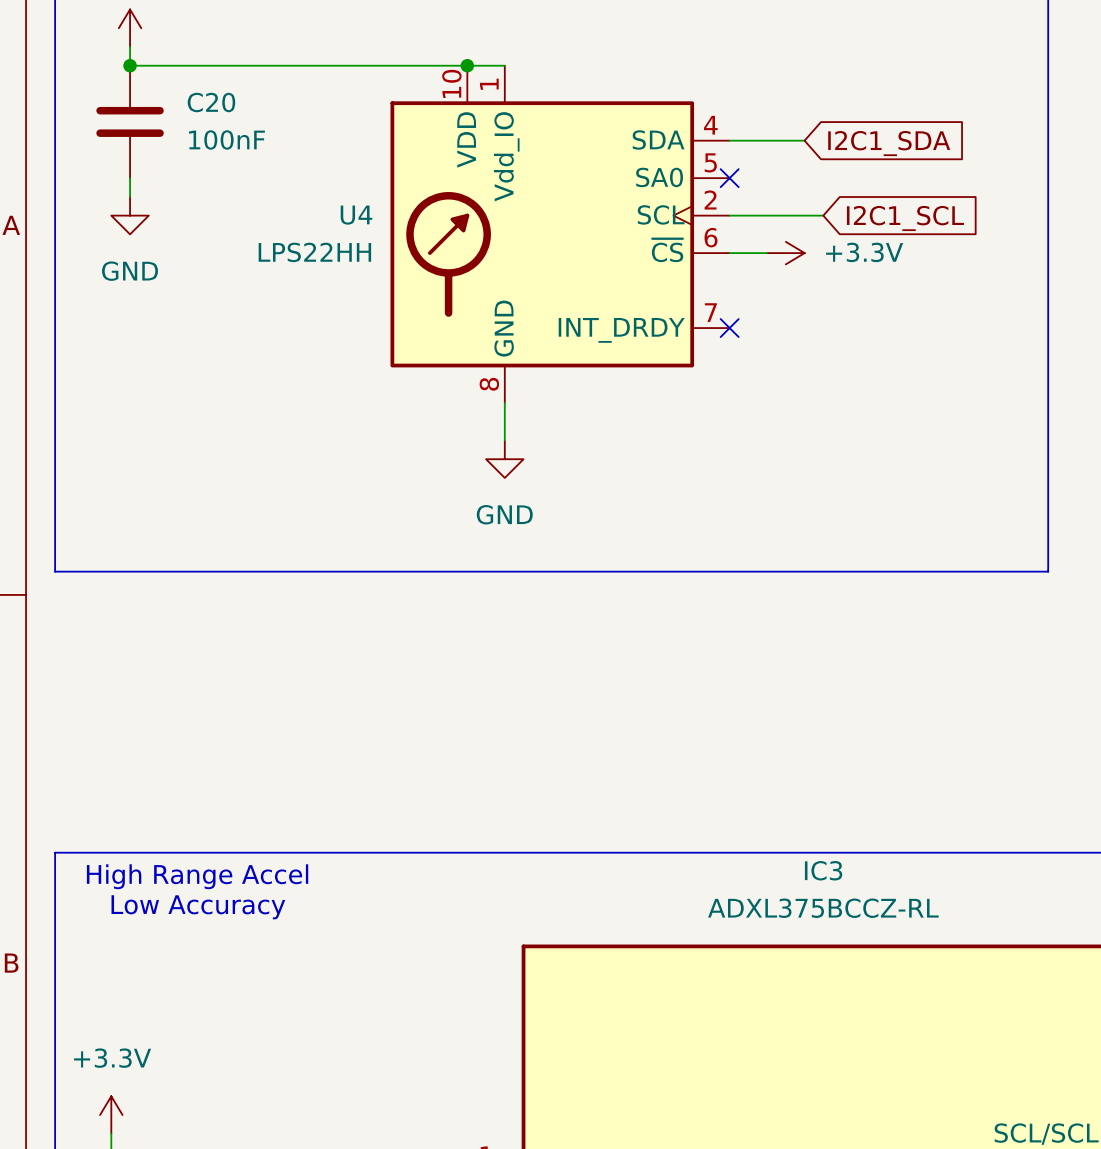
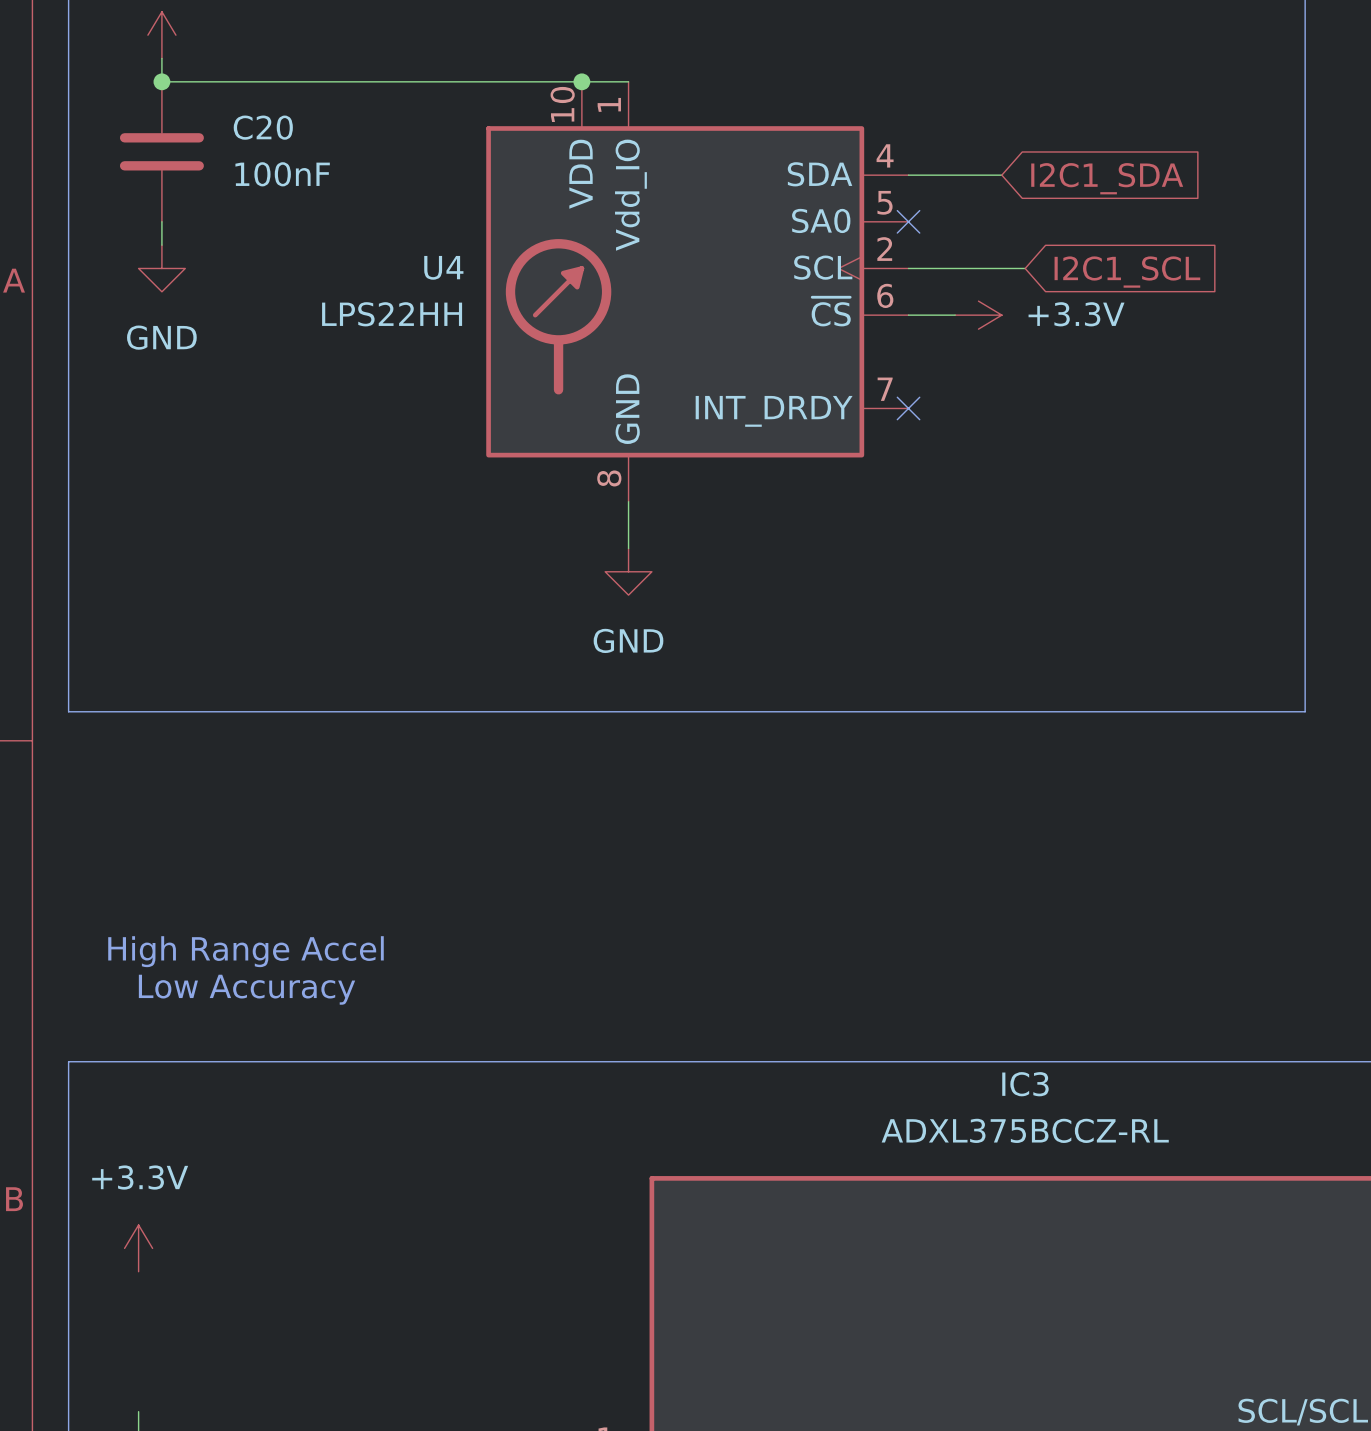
text position: High Range Accel (197, 876) -> High Range Accel (245, 951)
text position: Low Accuracy (198, 907) -> Low Accuracy (247, 989)
power symbol position: +3.3V (111, 1115) -> +3.3V (138, 1248)

